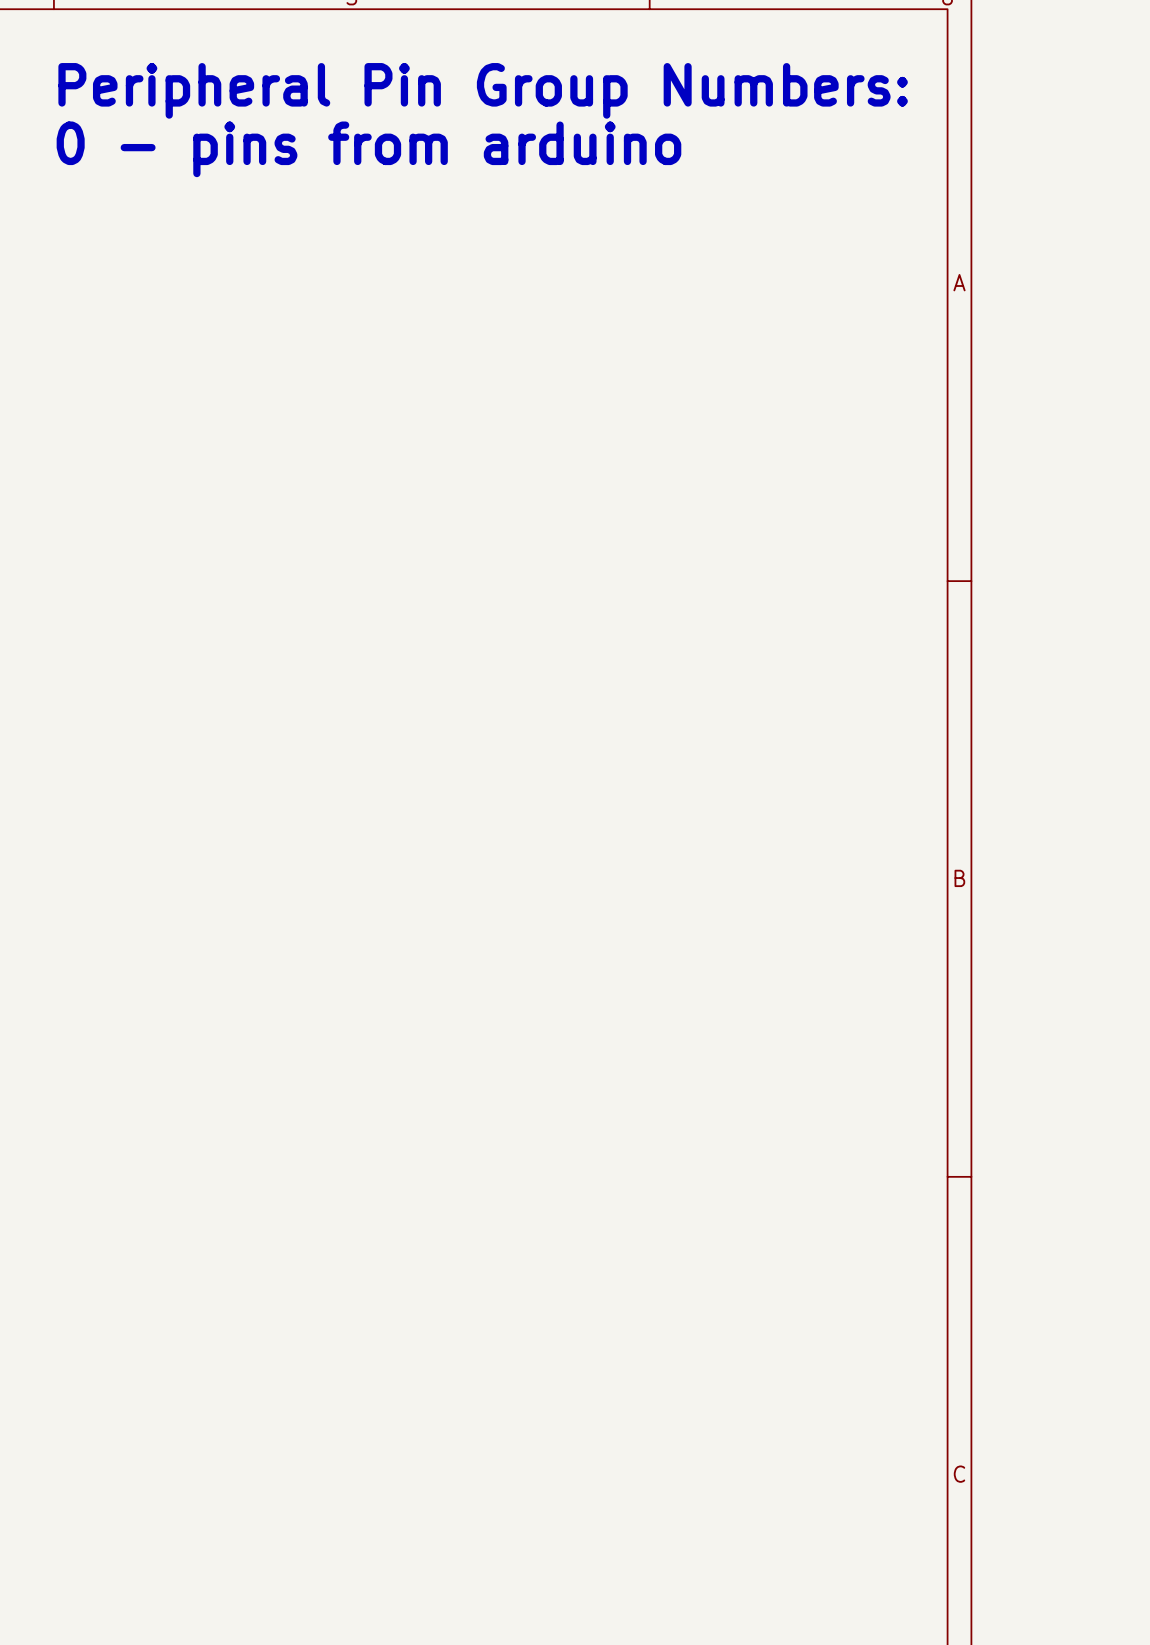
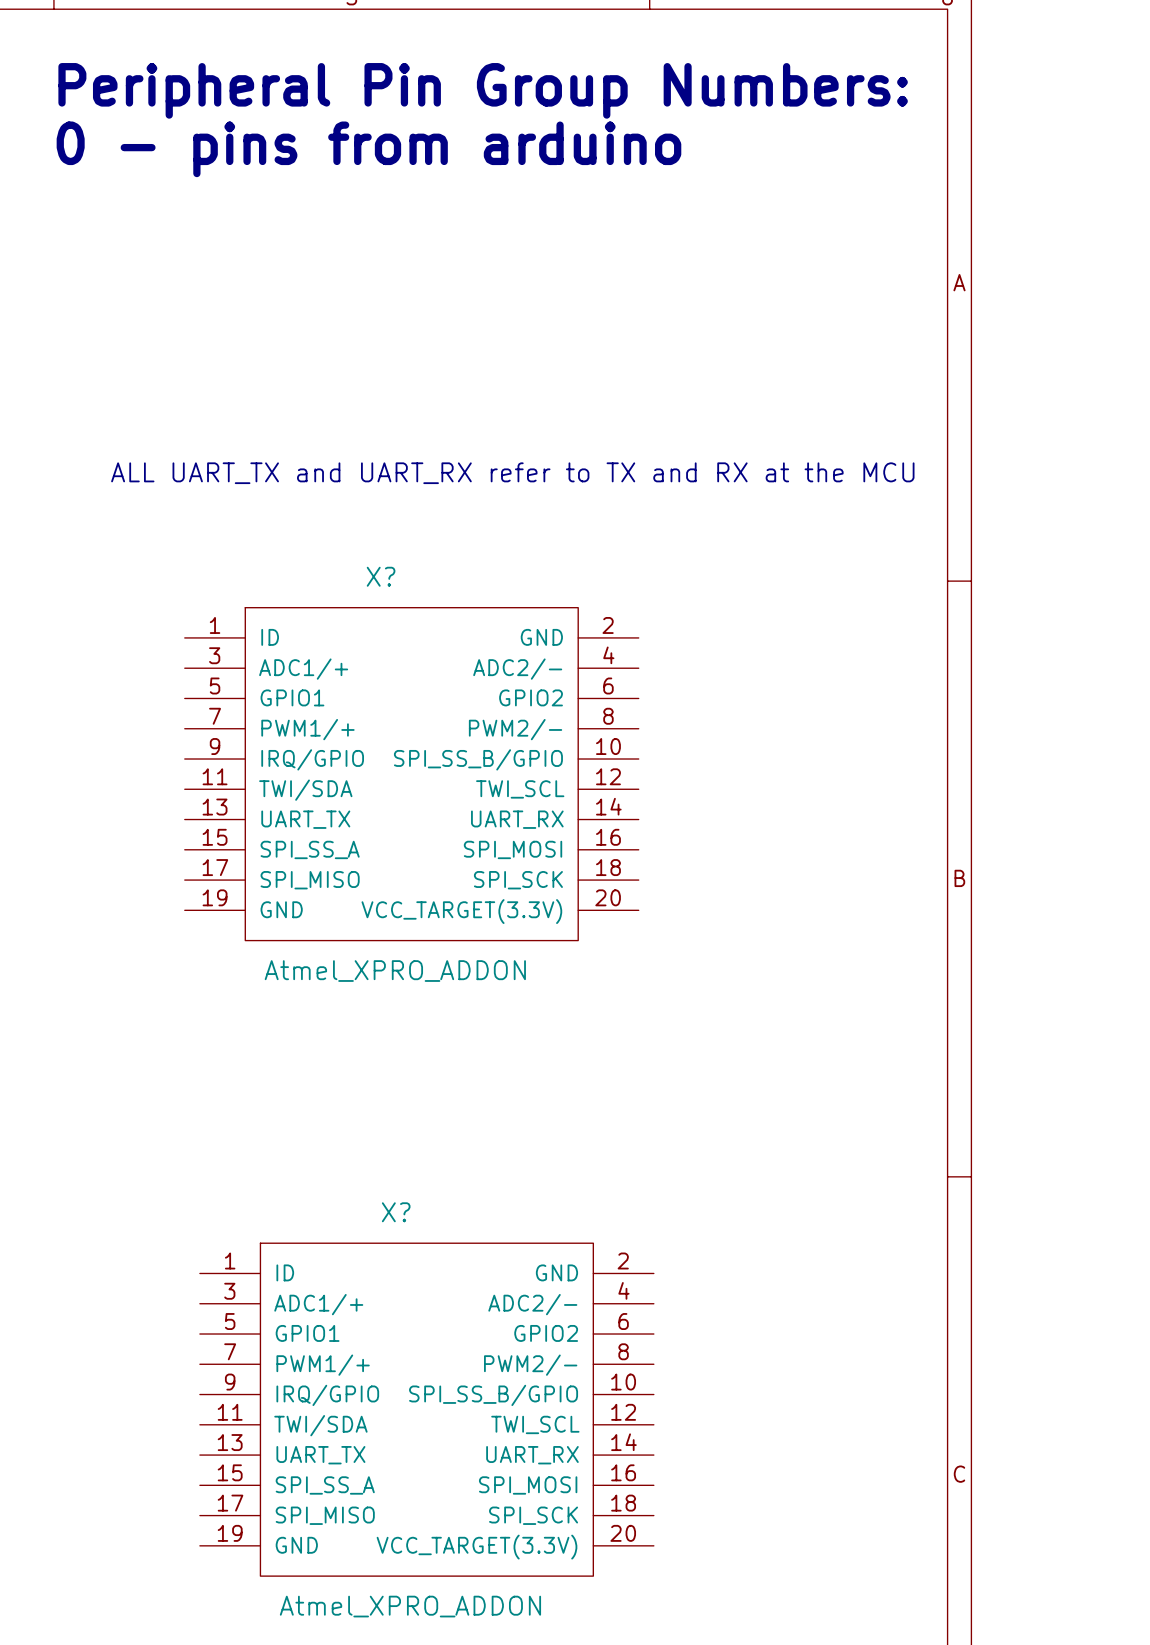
text: none -> ALL UART_TX and UART_RX refer to TX and RX at the MCU (512, 473)
X?: none -> Atmel_XPRO_ADDON (411, 774)
X?: none -> Atmel_XPRO_ADDON (426, 1409)

